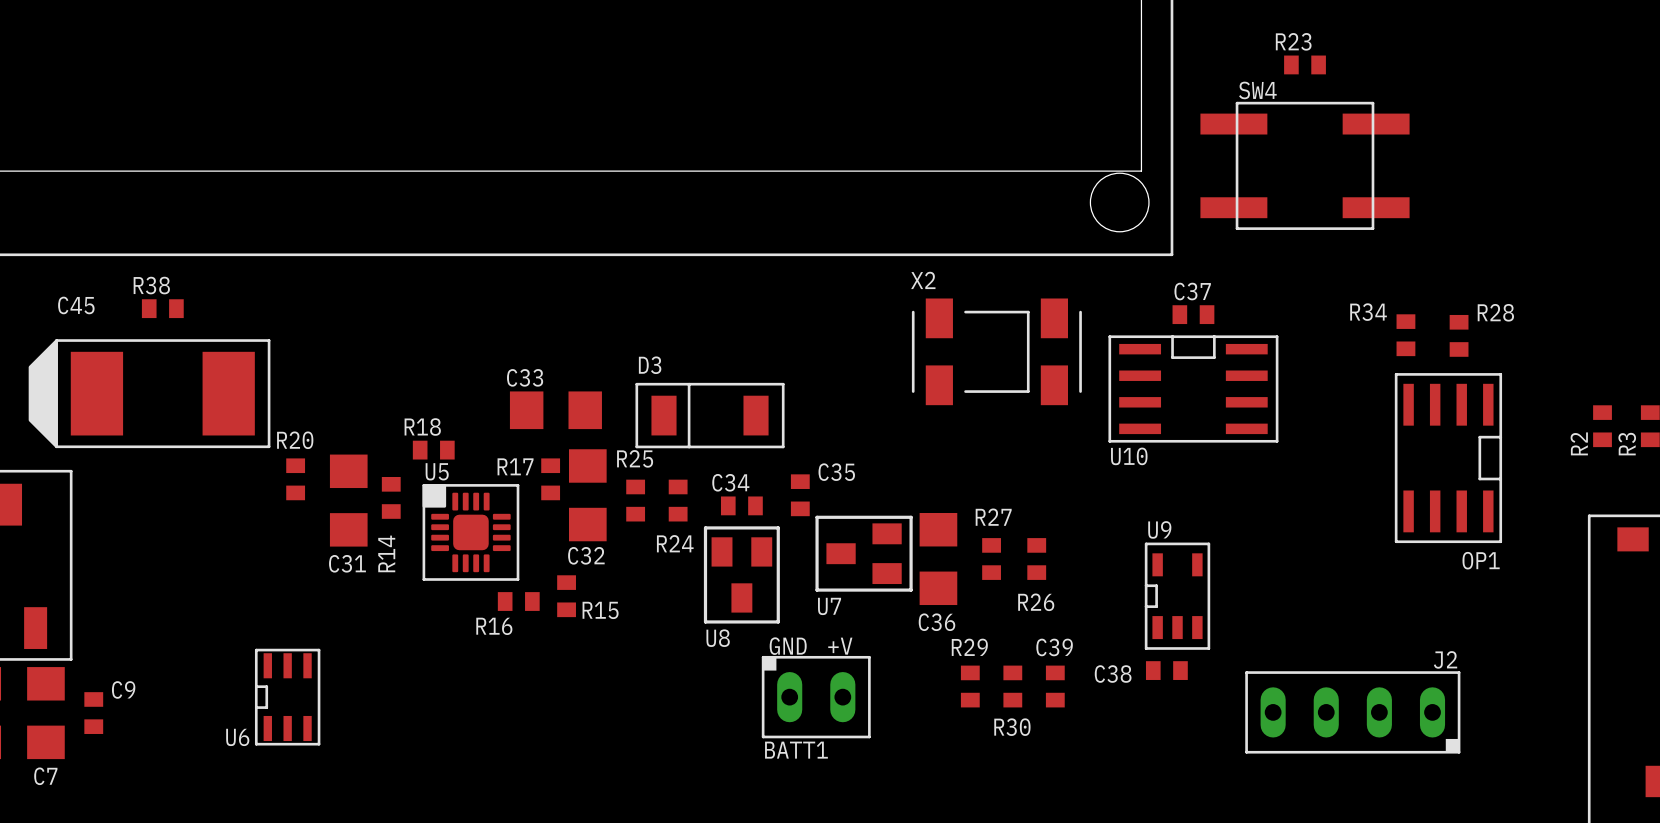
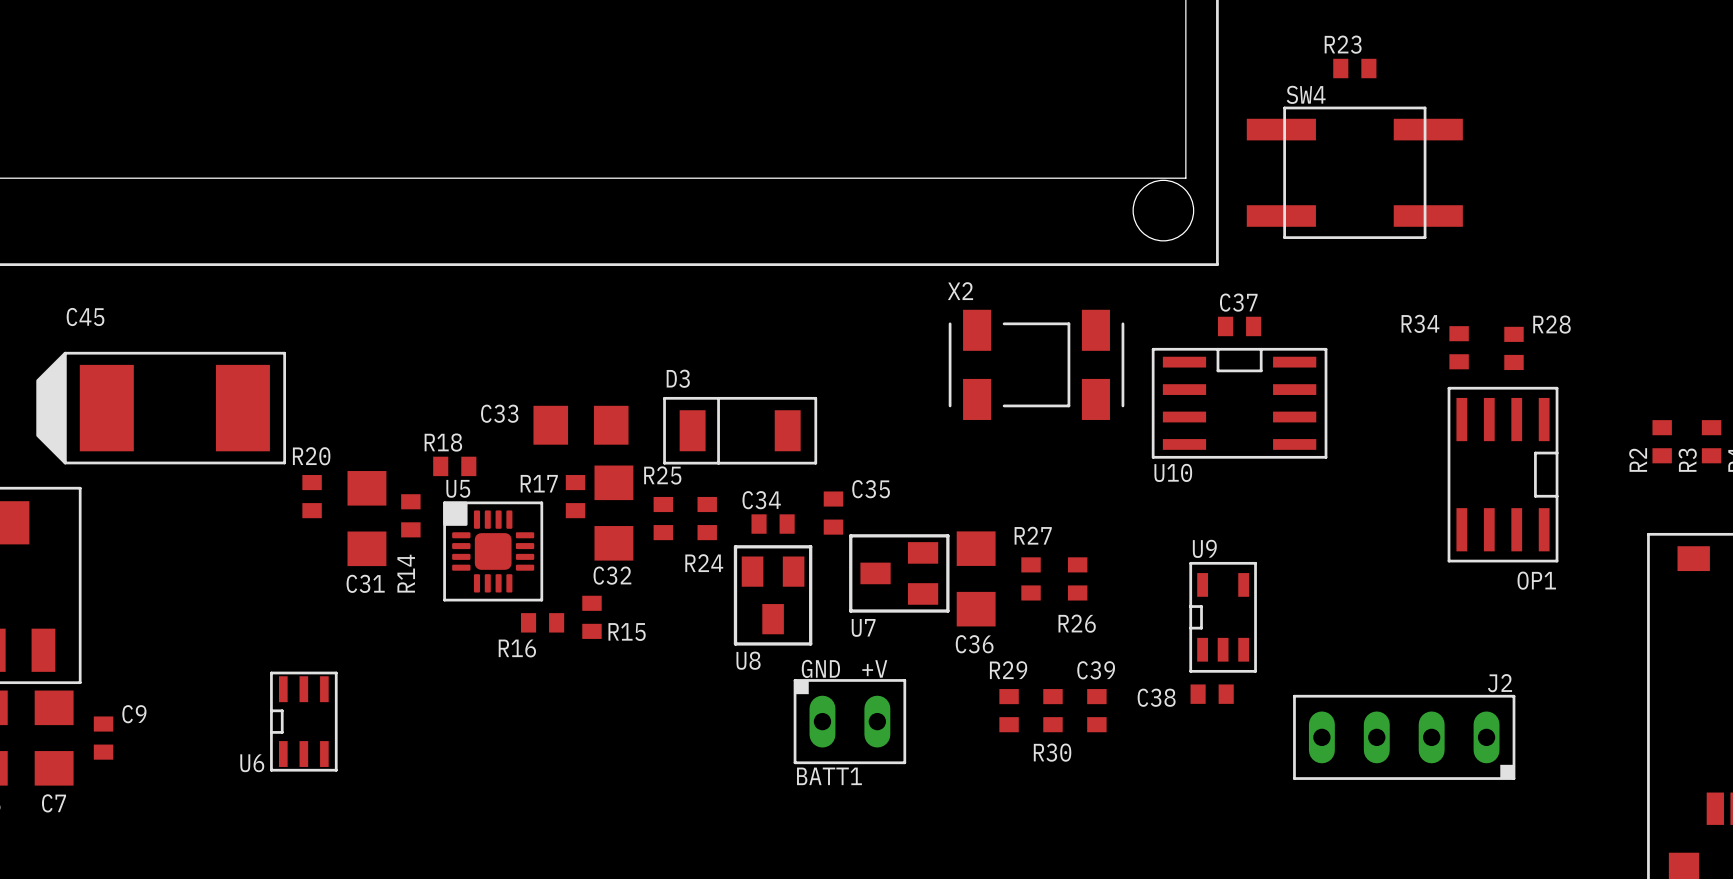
R38: (162, 308) -> none
C33 name position: C33 (525, 377) -> C33 (499, 413)

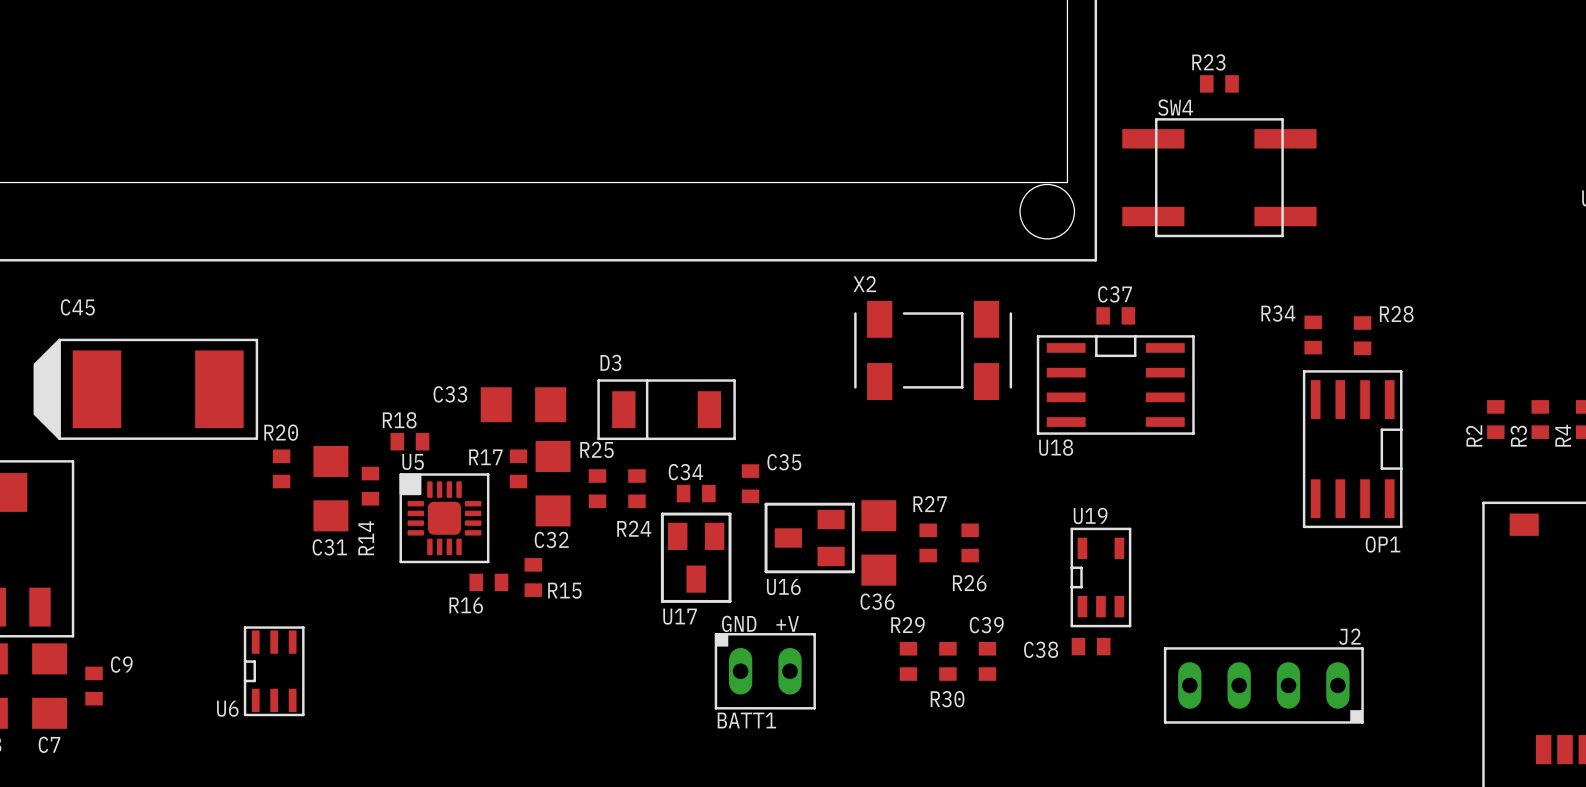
U10 name: U10 (1173, 472) -> U18 (1056, 447)
U9 name: U9 (1204, 548) -> U19 (1090, 515)
U7 name: U7 (863, 627) -> U16 (783, 587)
U8 name: U8 (748, 660) -> U17 (680, 616)

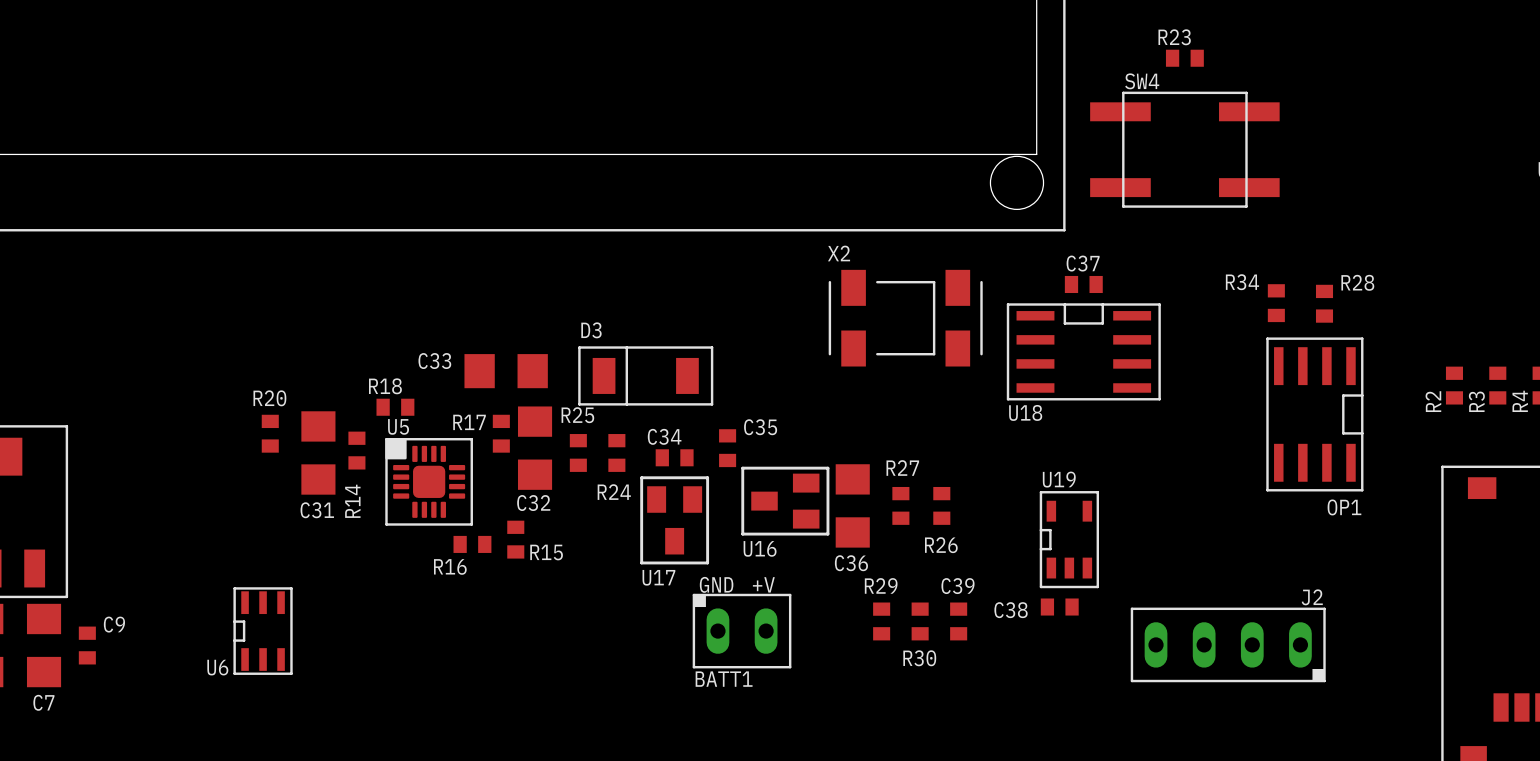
C45: (145, 389) -> none

